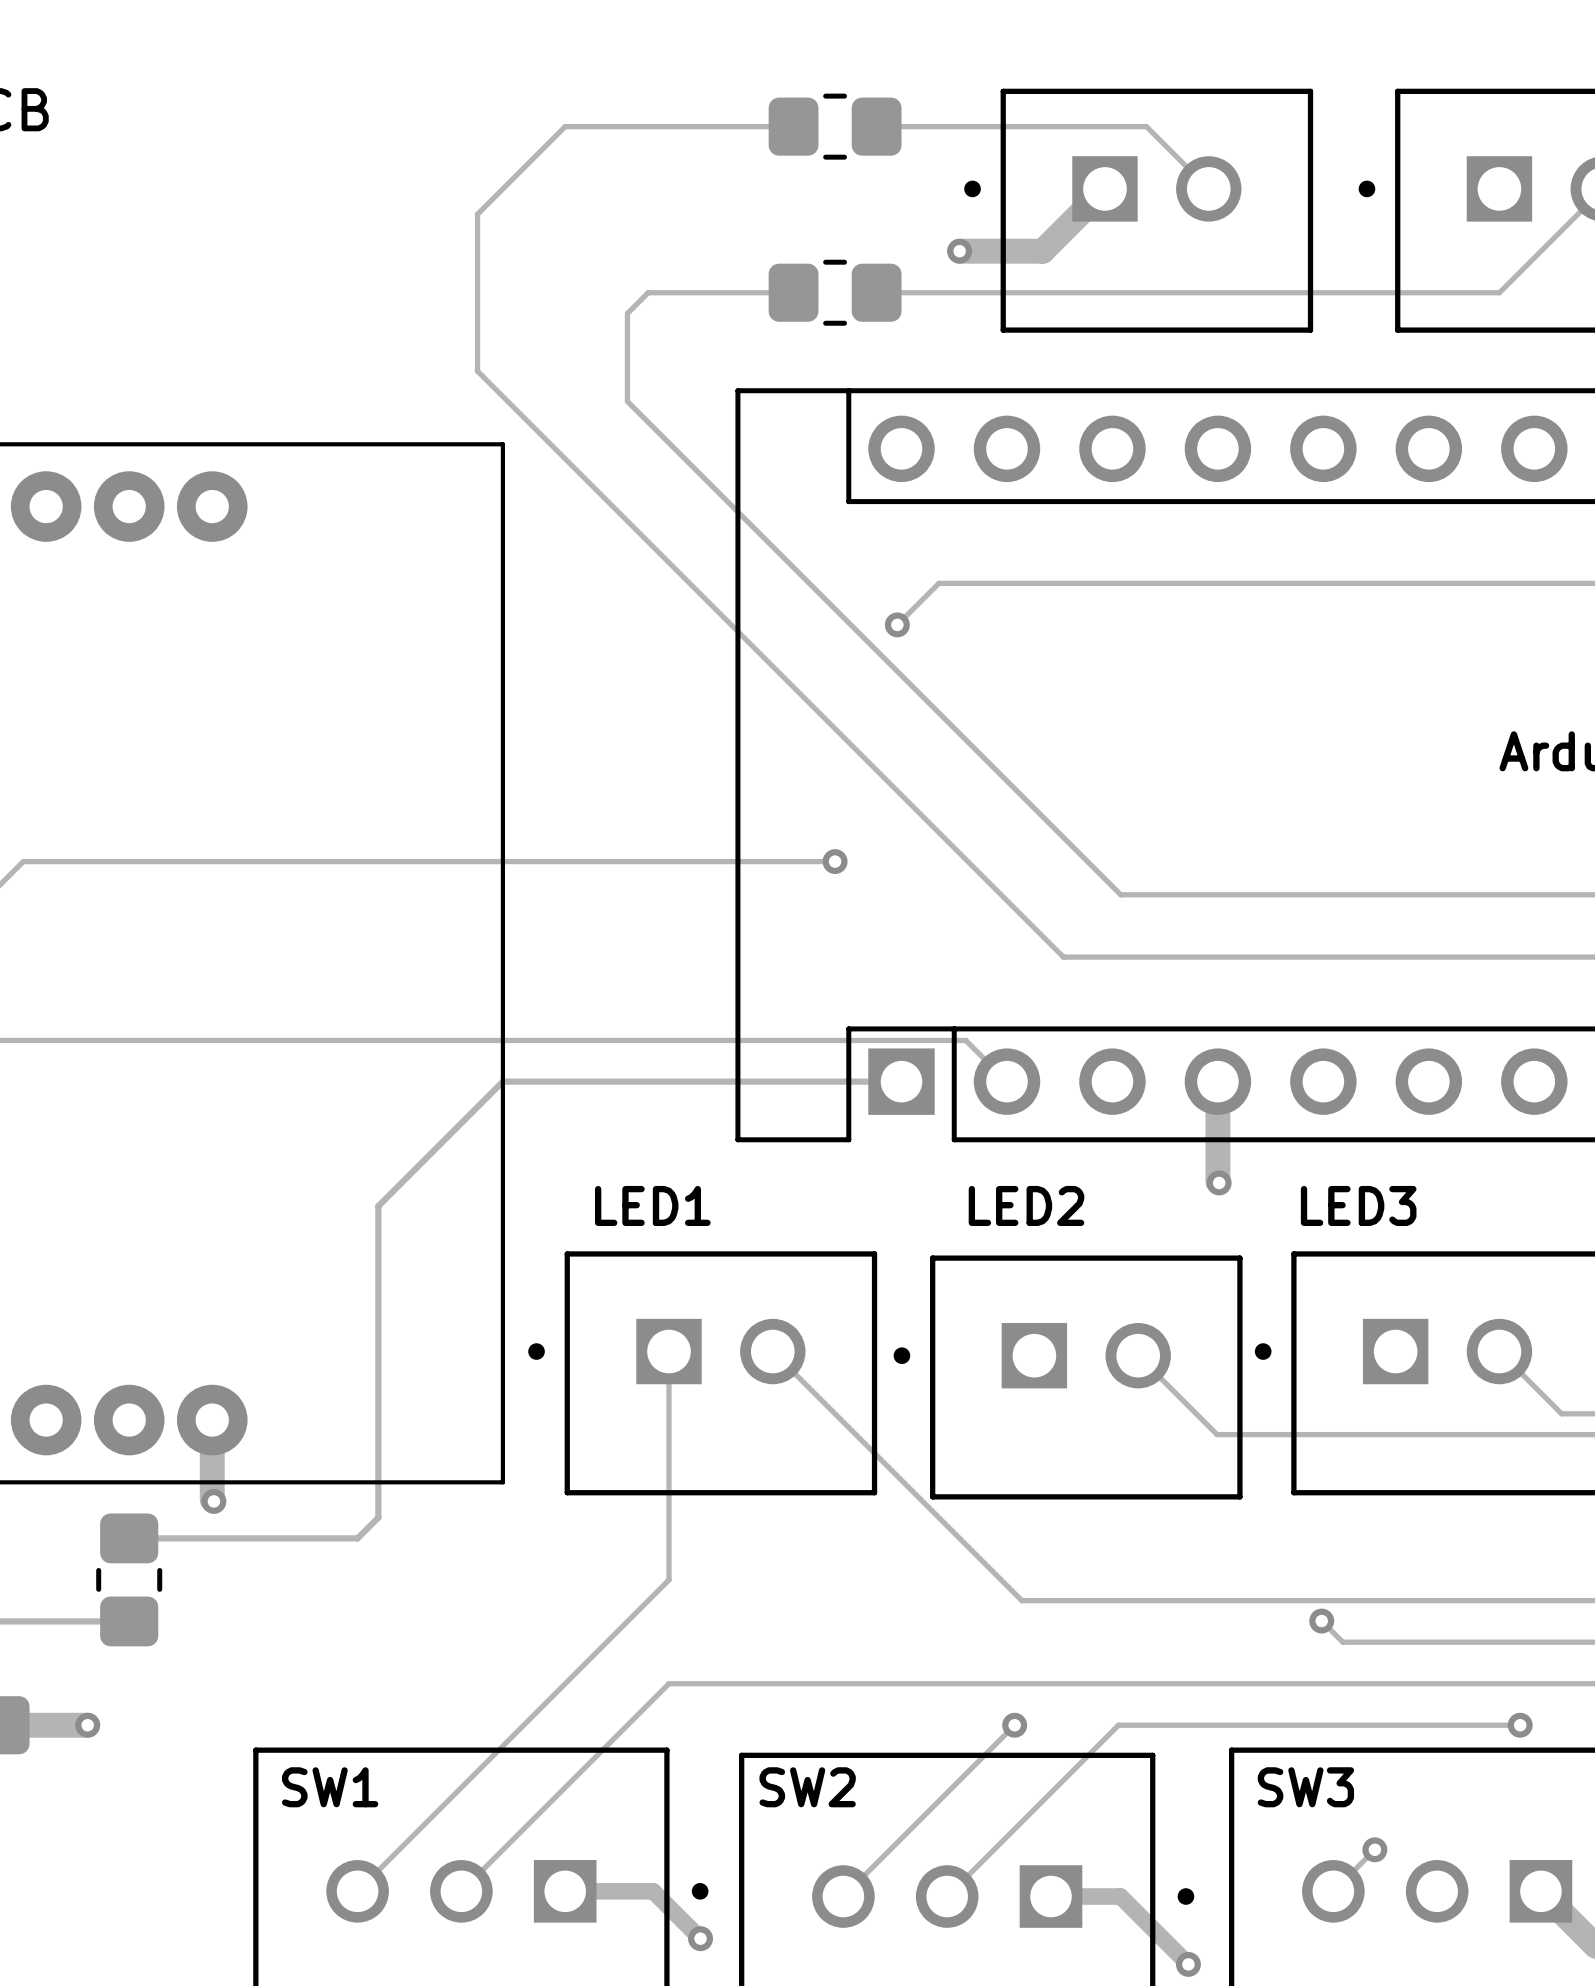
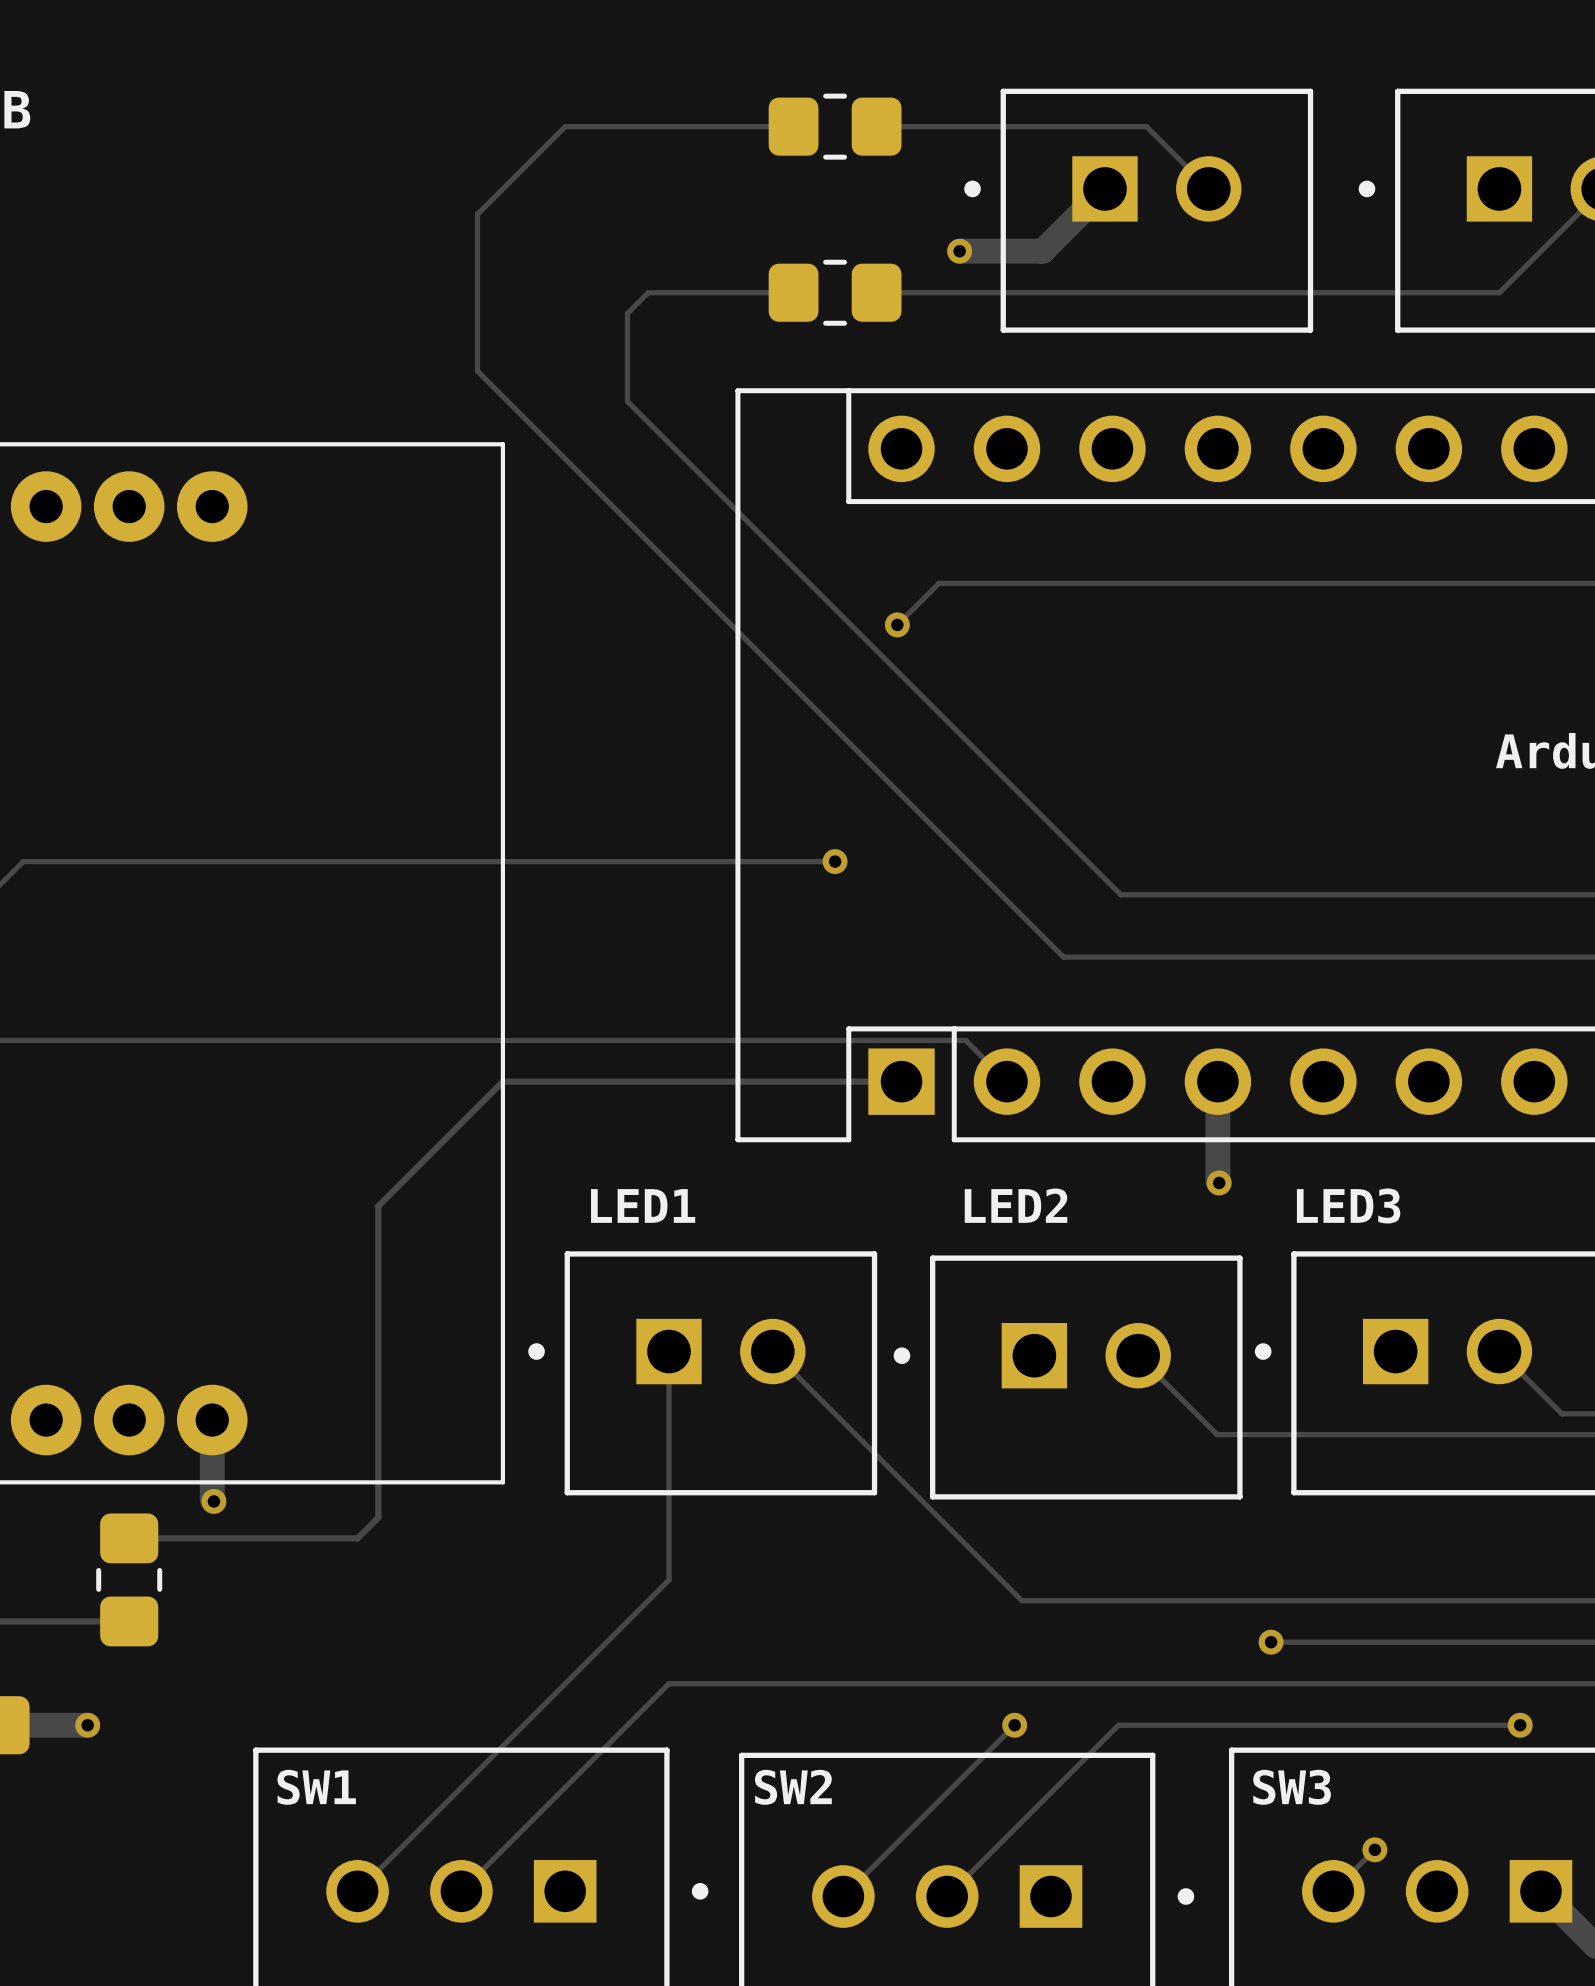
track: (1321, 1621) (1342, 1642) -> (1271, 1642) (1342, 1642)
via position: (1321, 1621) -> (1271, 1642)
track: (565, 1891) (653, 1891) (700, 1938) -> none
track: (1051, 1896) (1120, 1896) (1188, 1964) -> none
via: (700, 1938) -> none
via: (1188, 1964) -> none

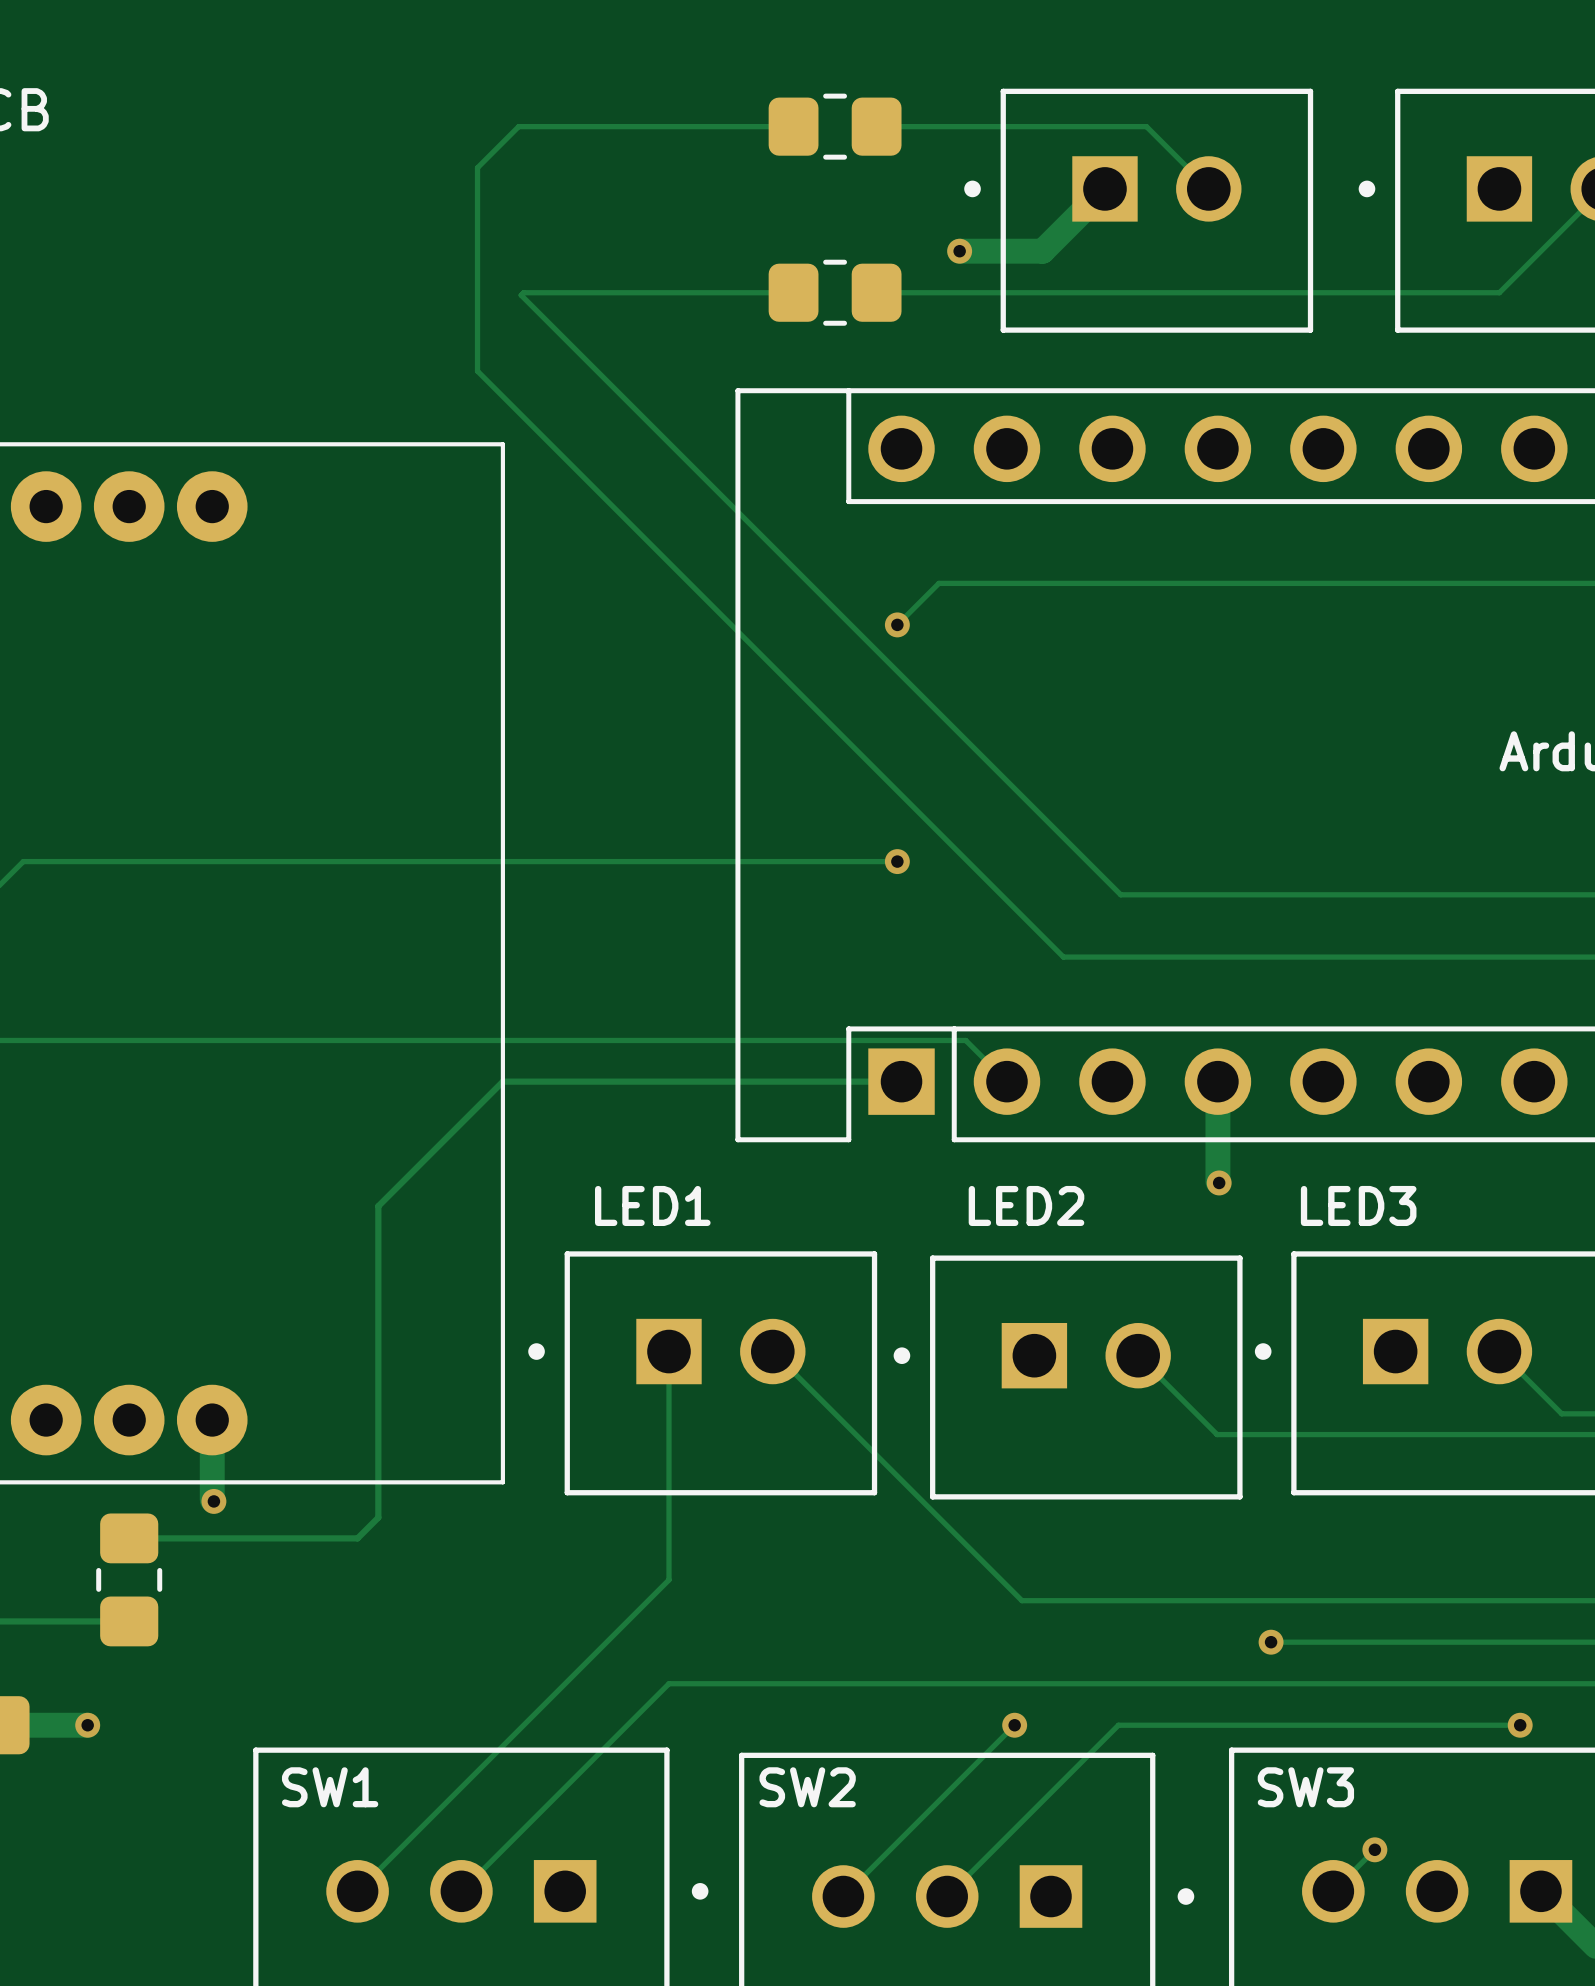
track: (565, 126) (477, 214) -> (565, 126) (518, 126) (477, 167) (477, 214)
track: (648, 292) (627, 313) (627, 401) -> (648, 292) (523, 292) (521, 295) (627, 401)
track: none -> (835, 861) (897, 861)
via position: (835, 861) -> (897, 861)

